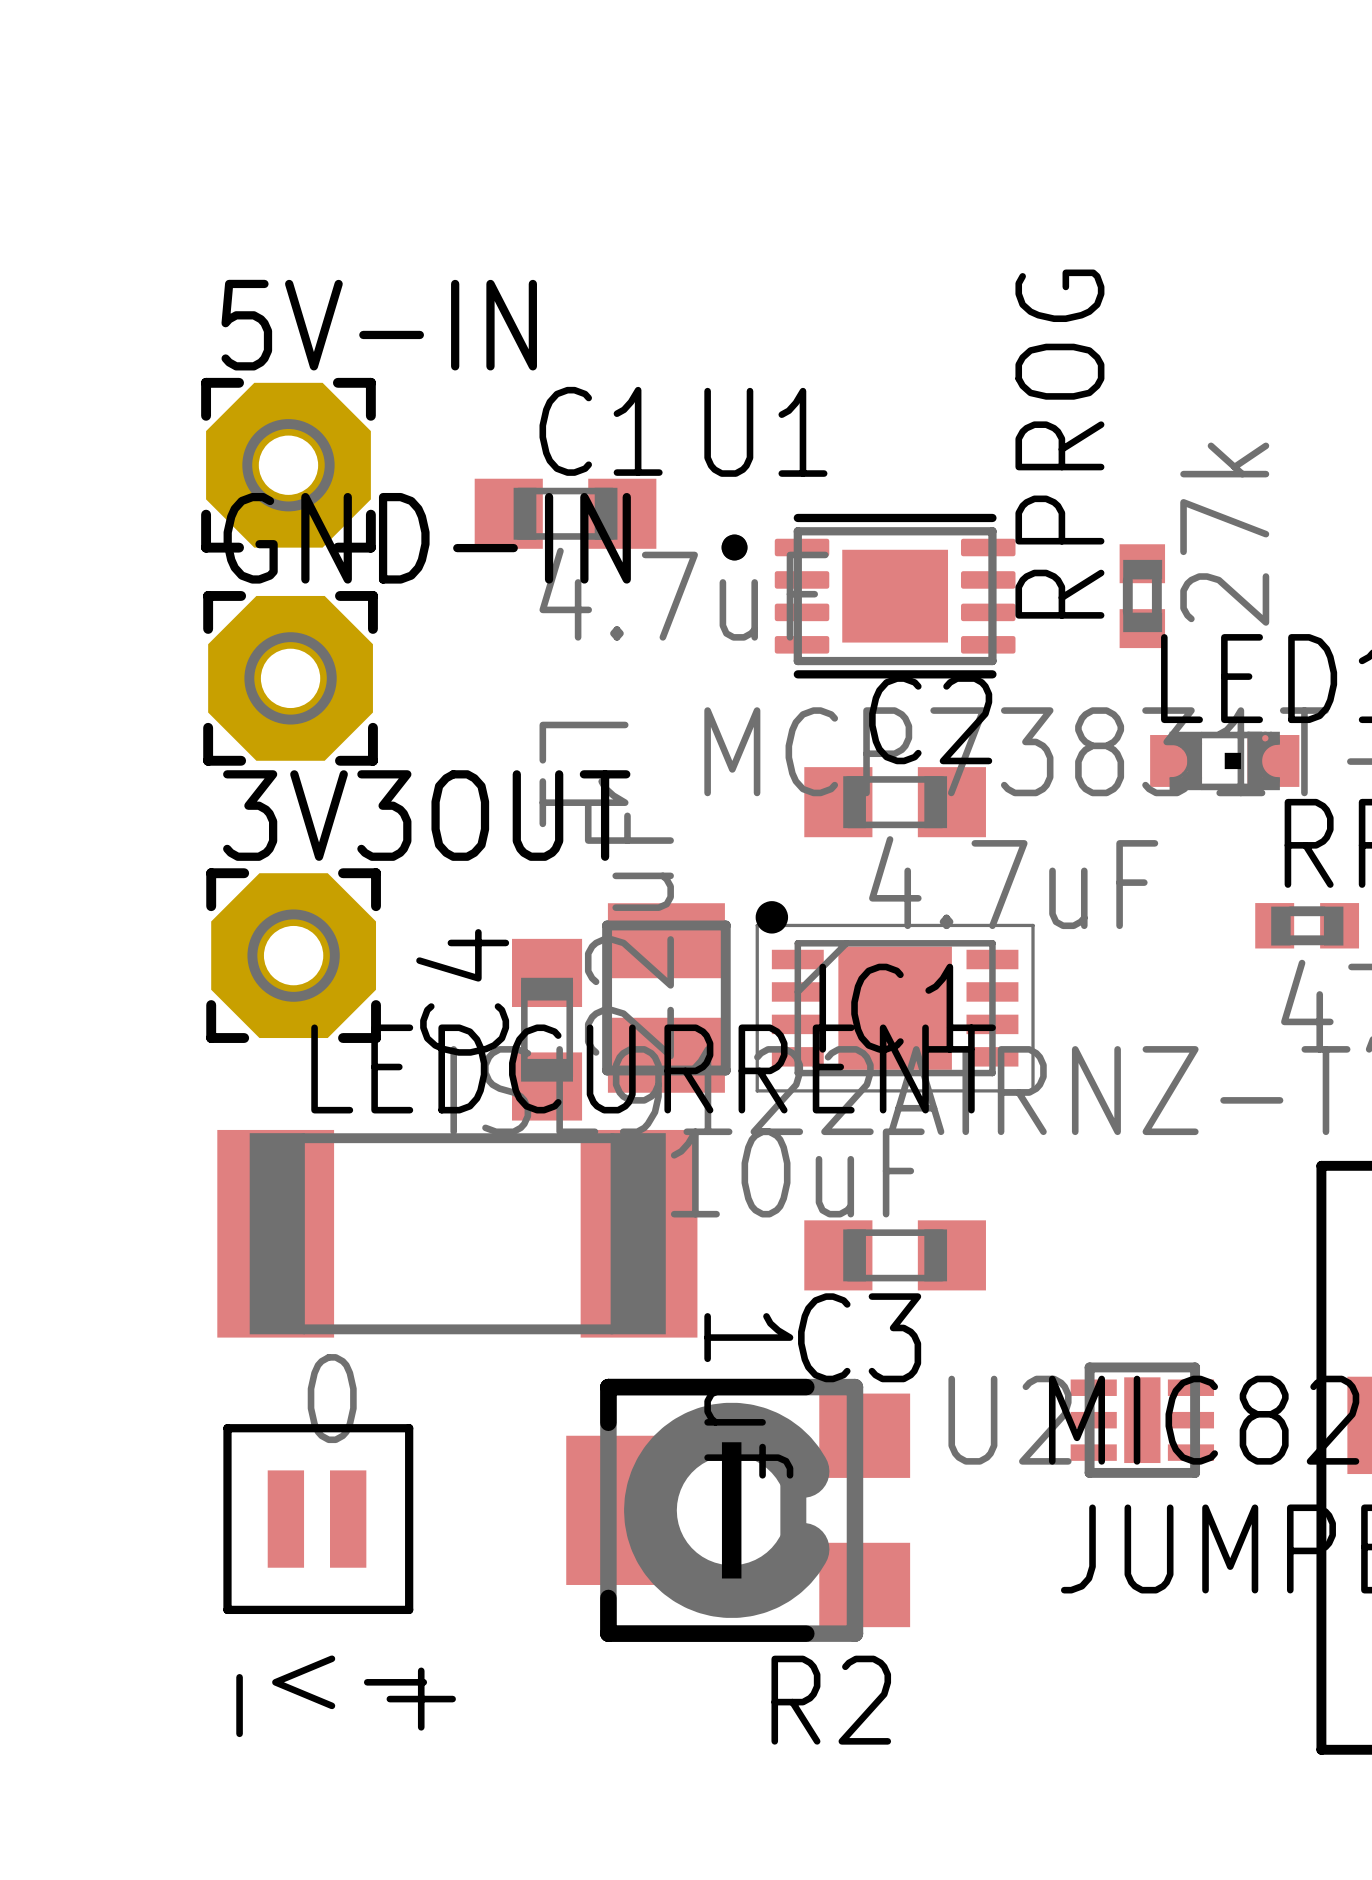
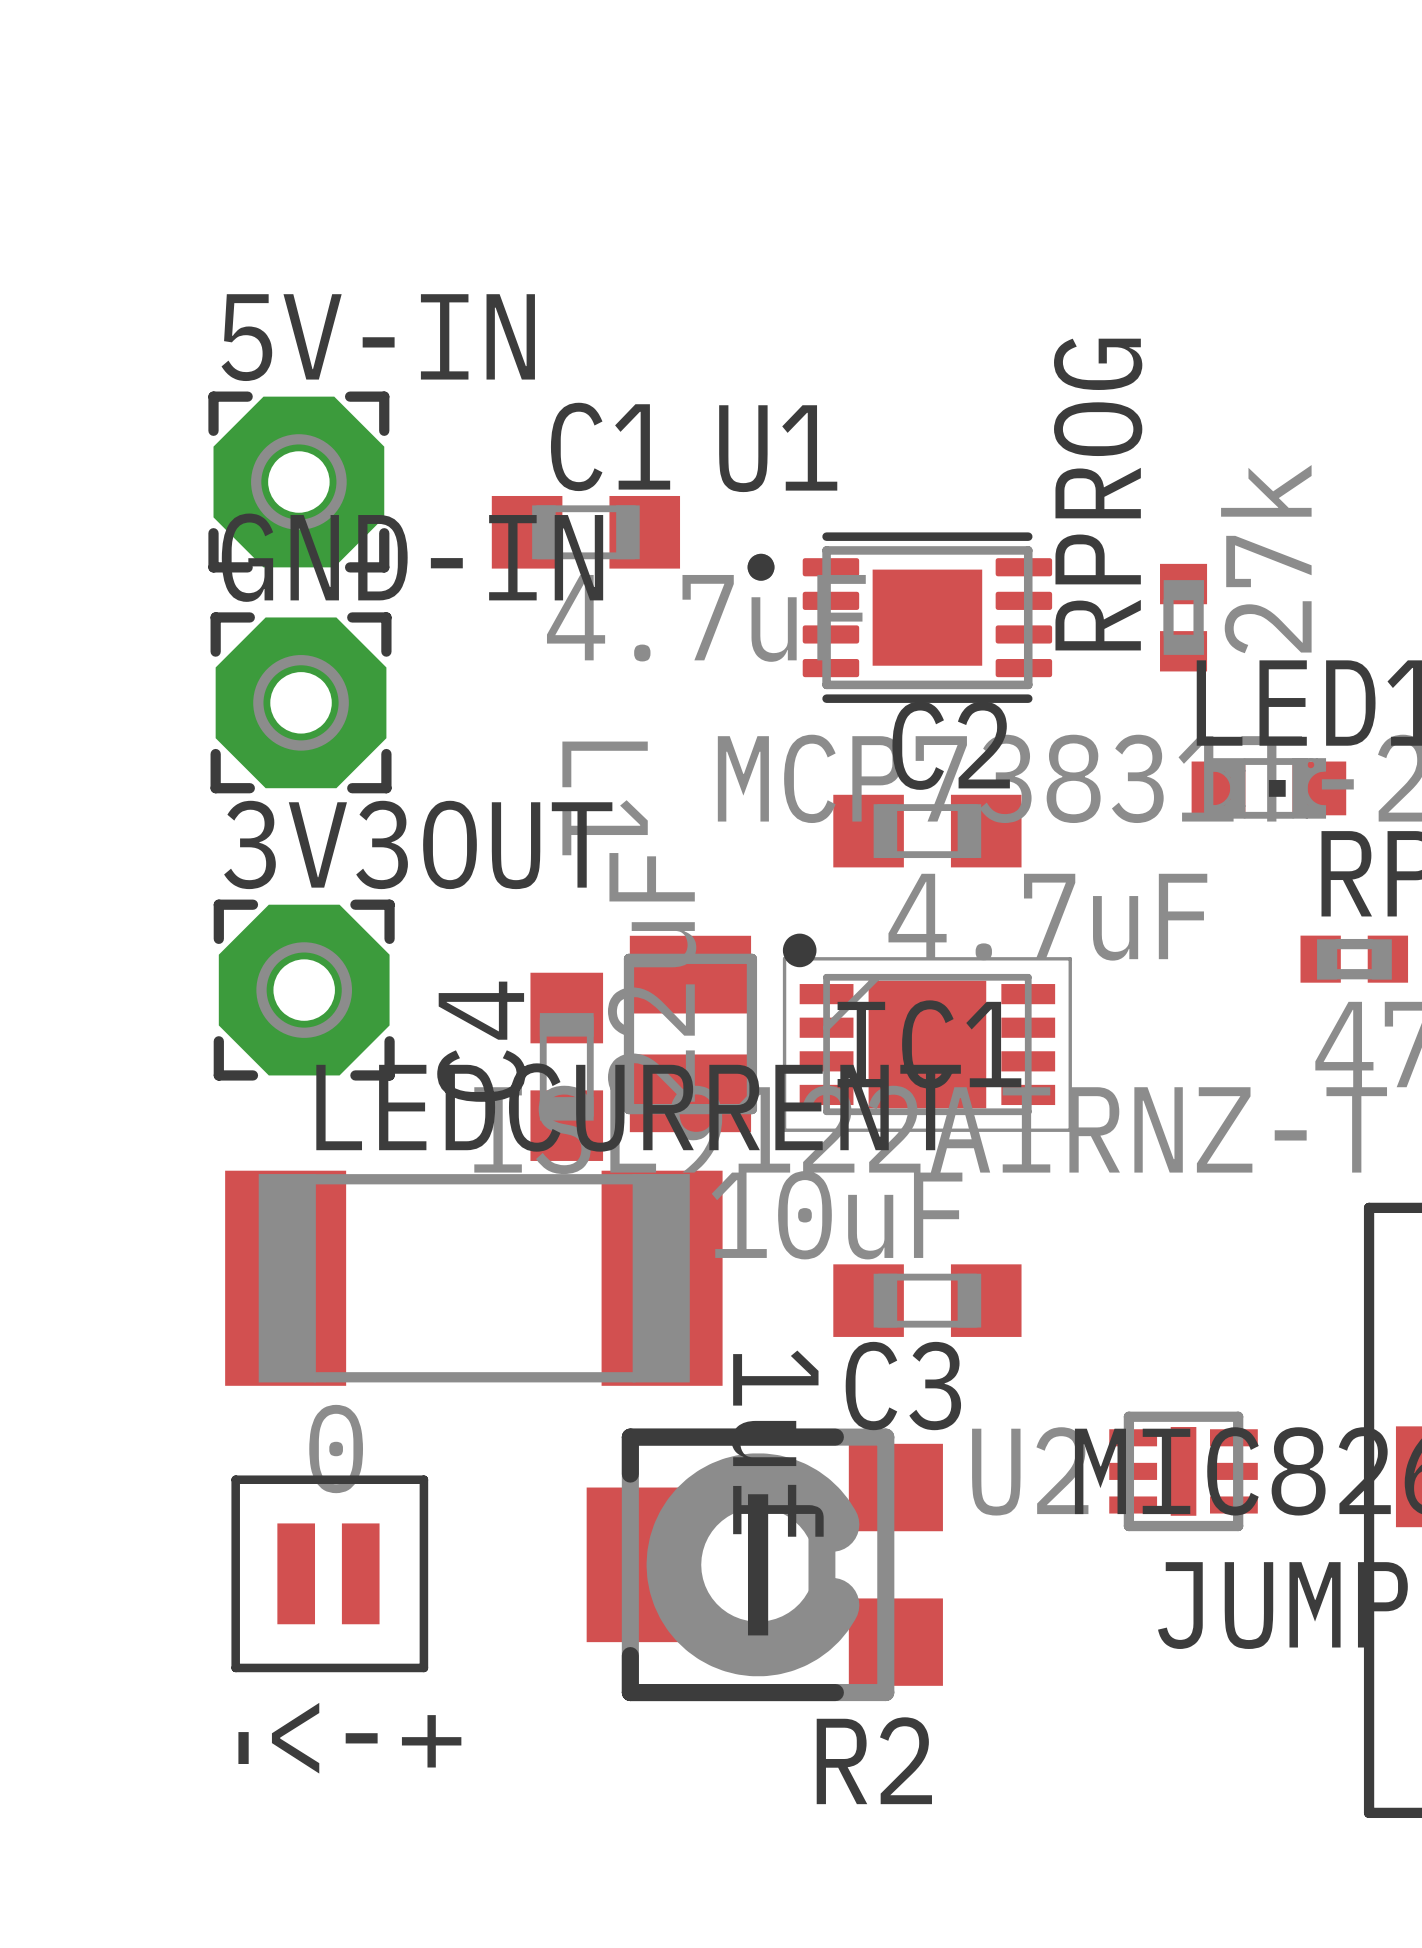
U2 footprint: [1070, 1362, 1215, 1478] -> [1109, 1411, 1258, 1532]

